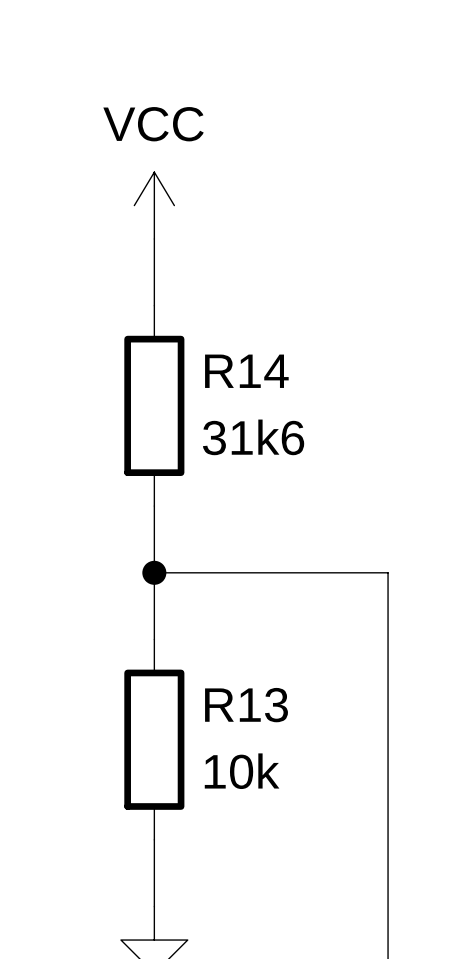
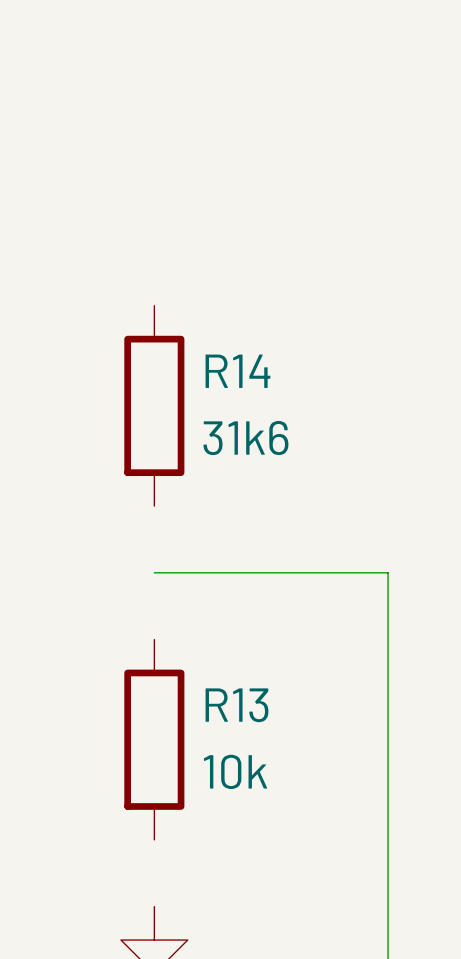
power symbol: VCC (154, 205) -> none
wire: (154, 238) (154, 305) -> none
wire: (154, 506) (154, 639) -> none
junction: (154, 572) -> none
wire: (154, 839) (154, 906) -> none

